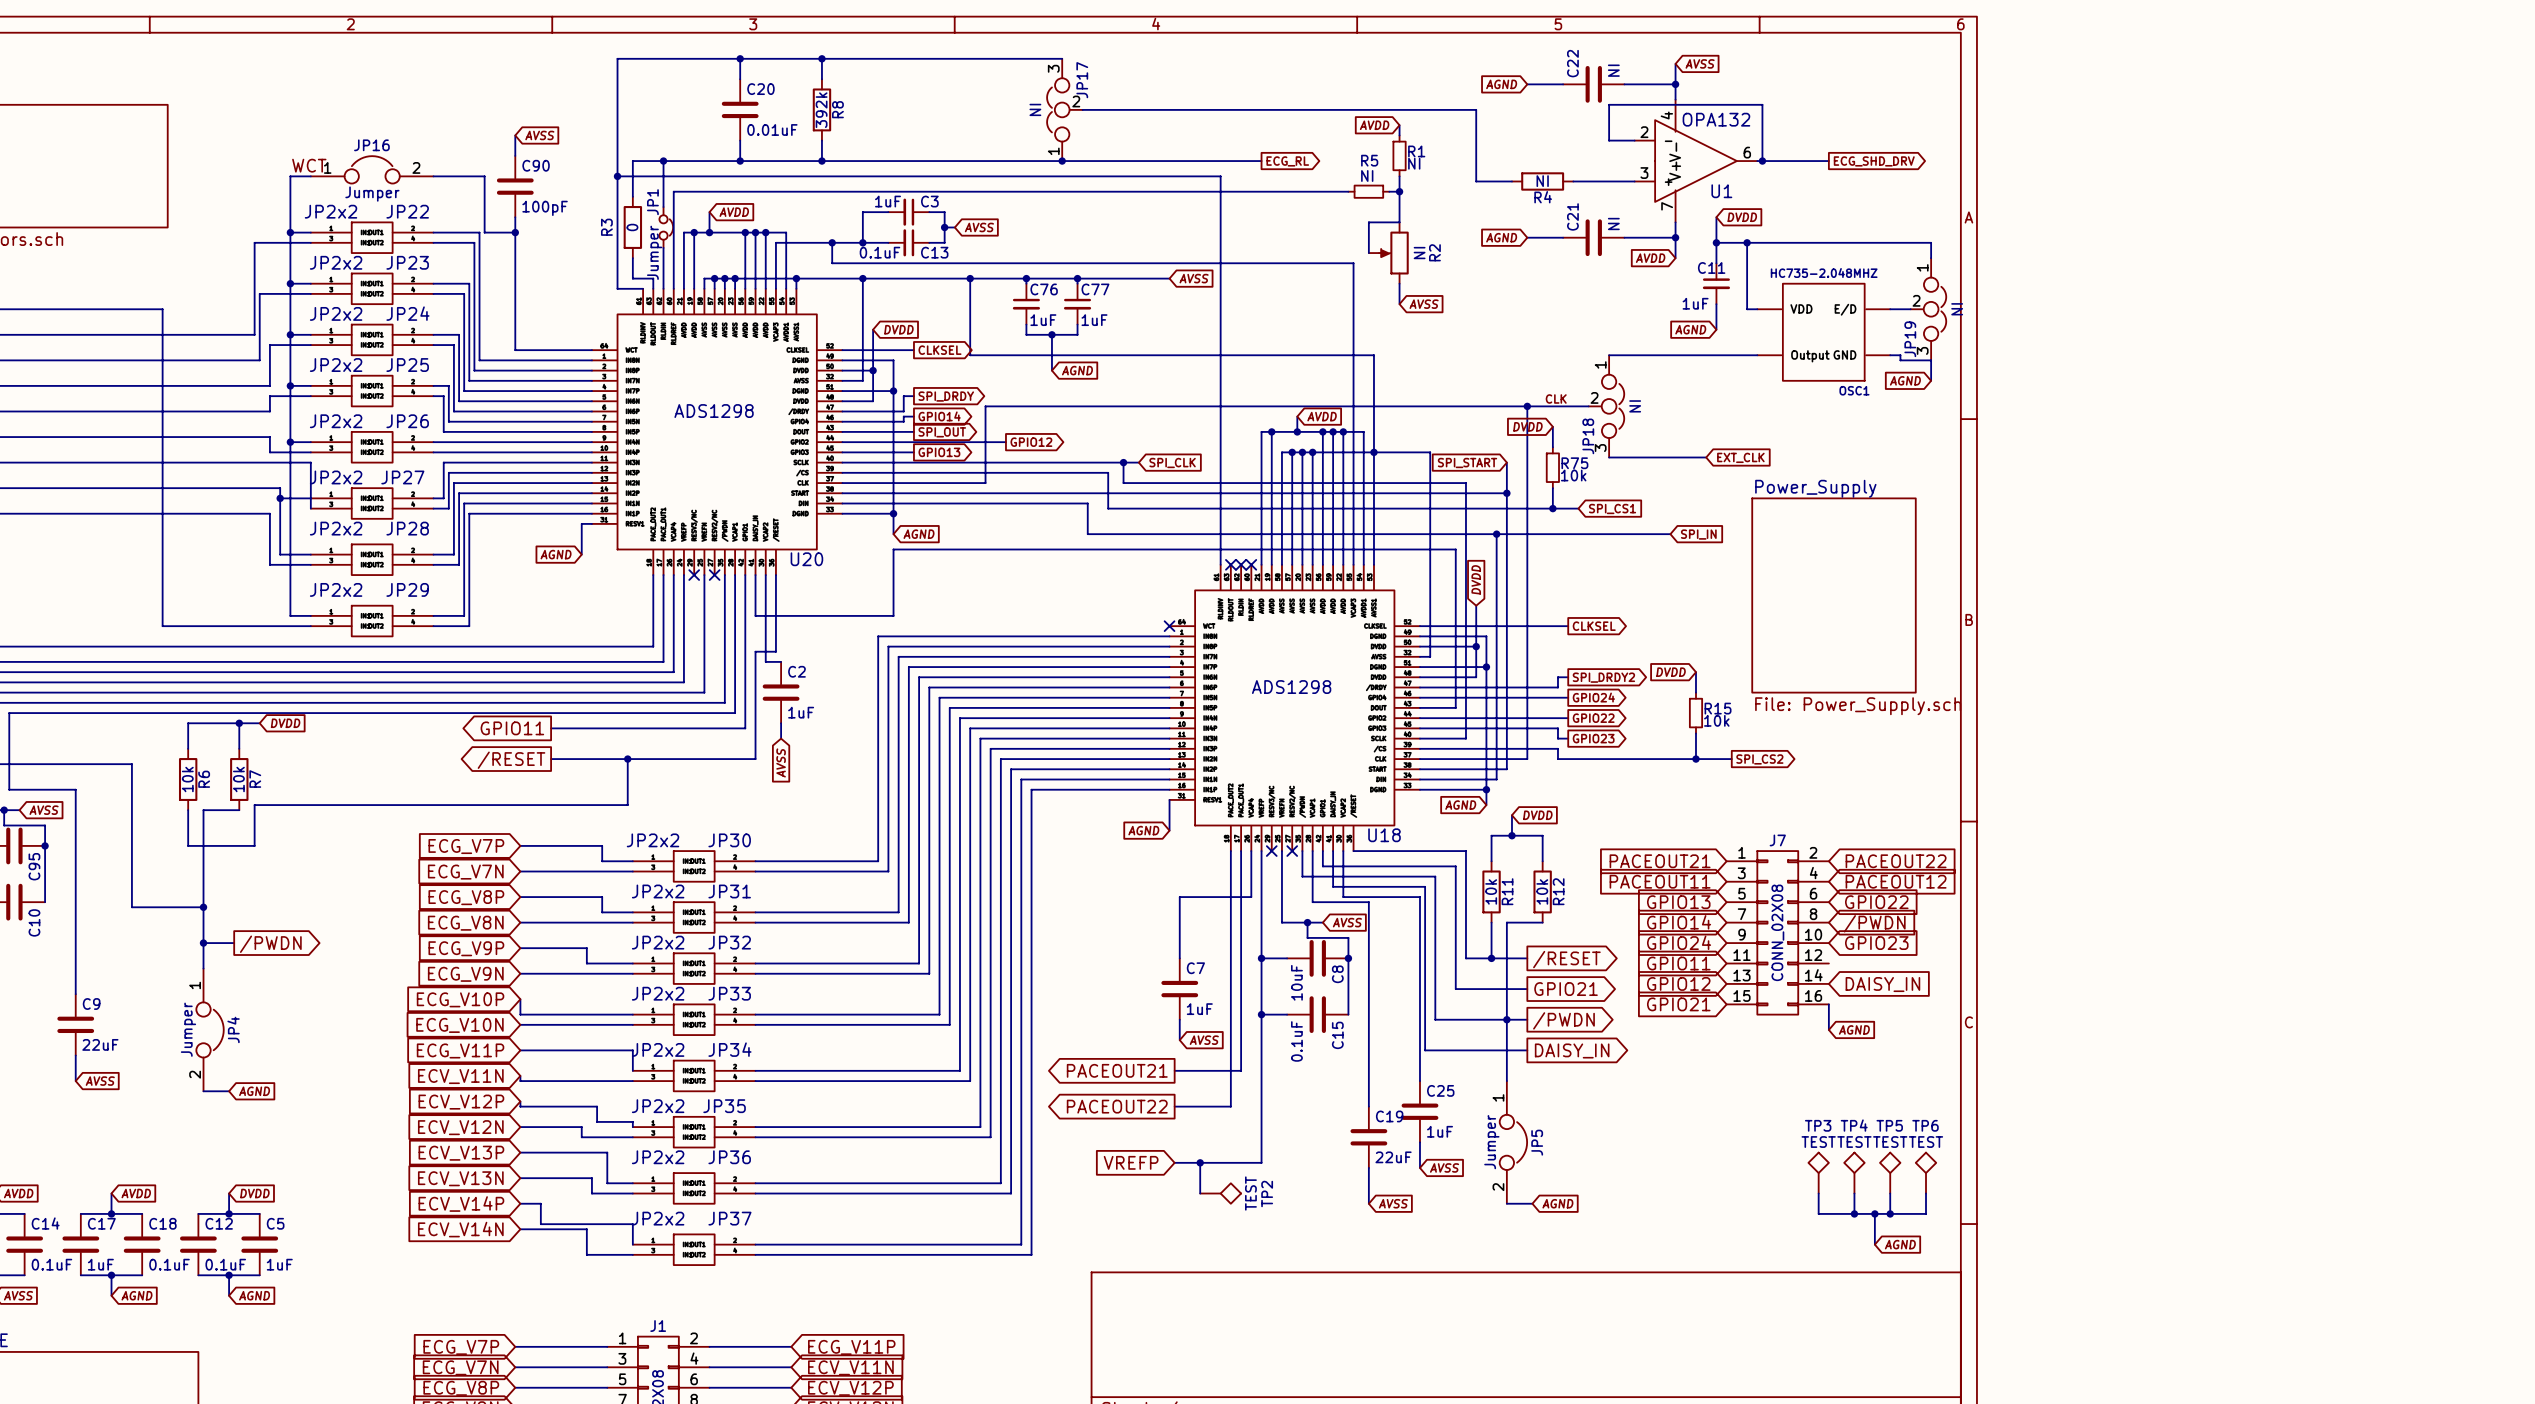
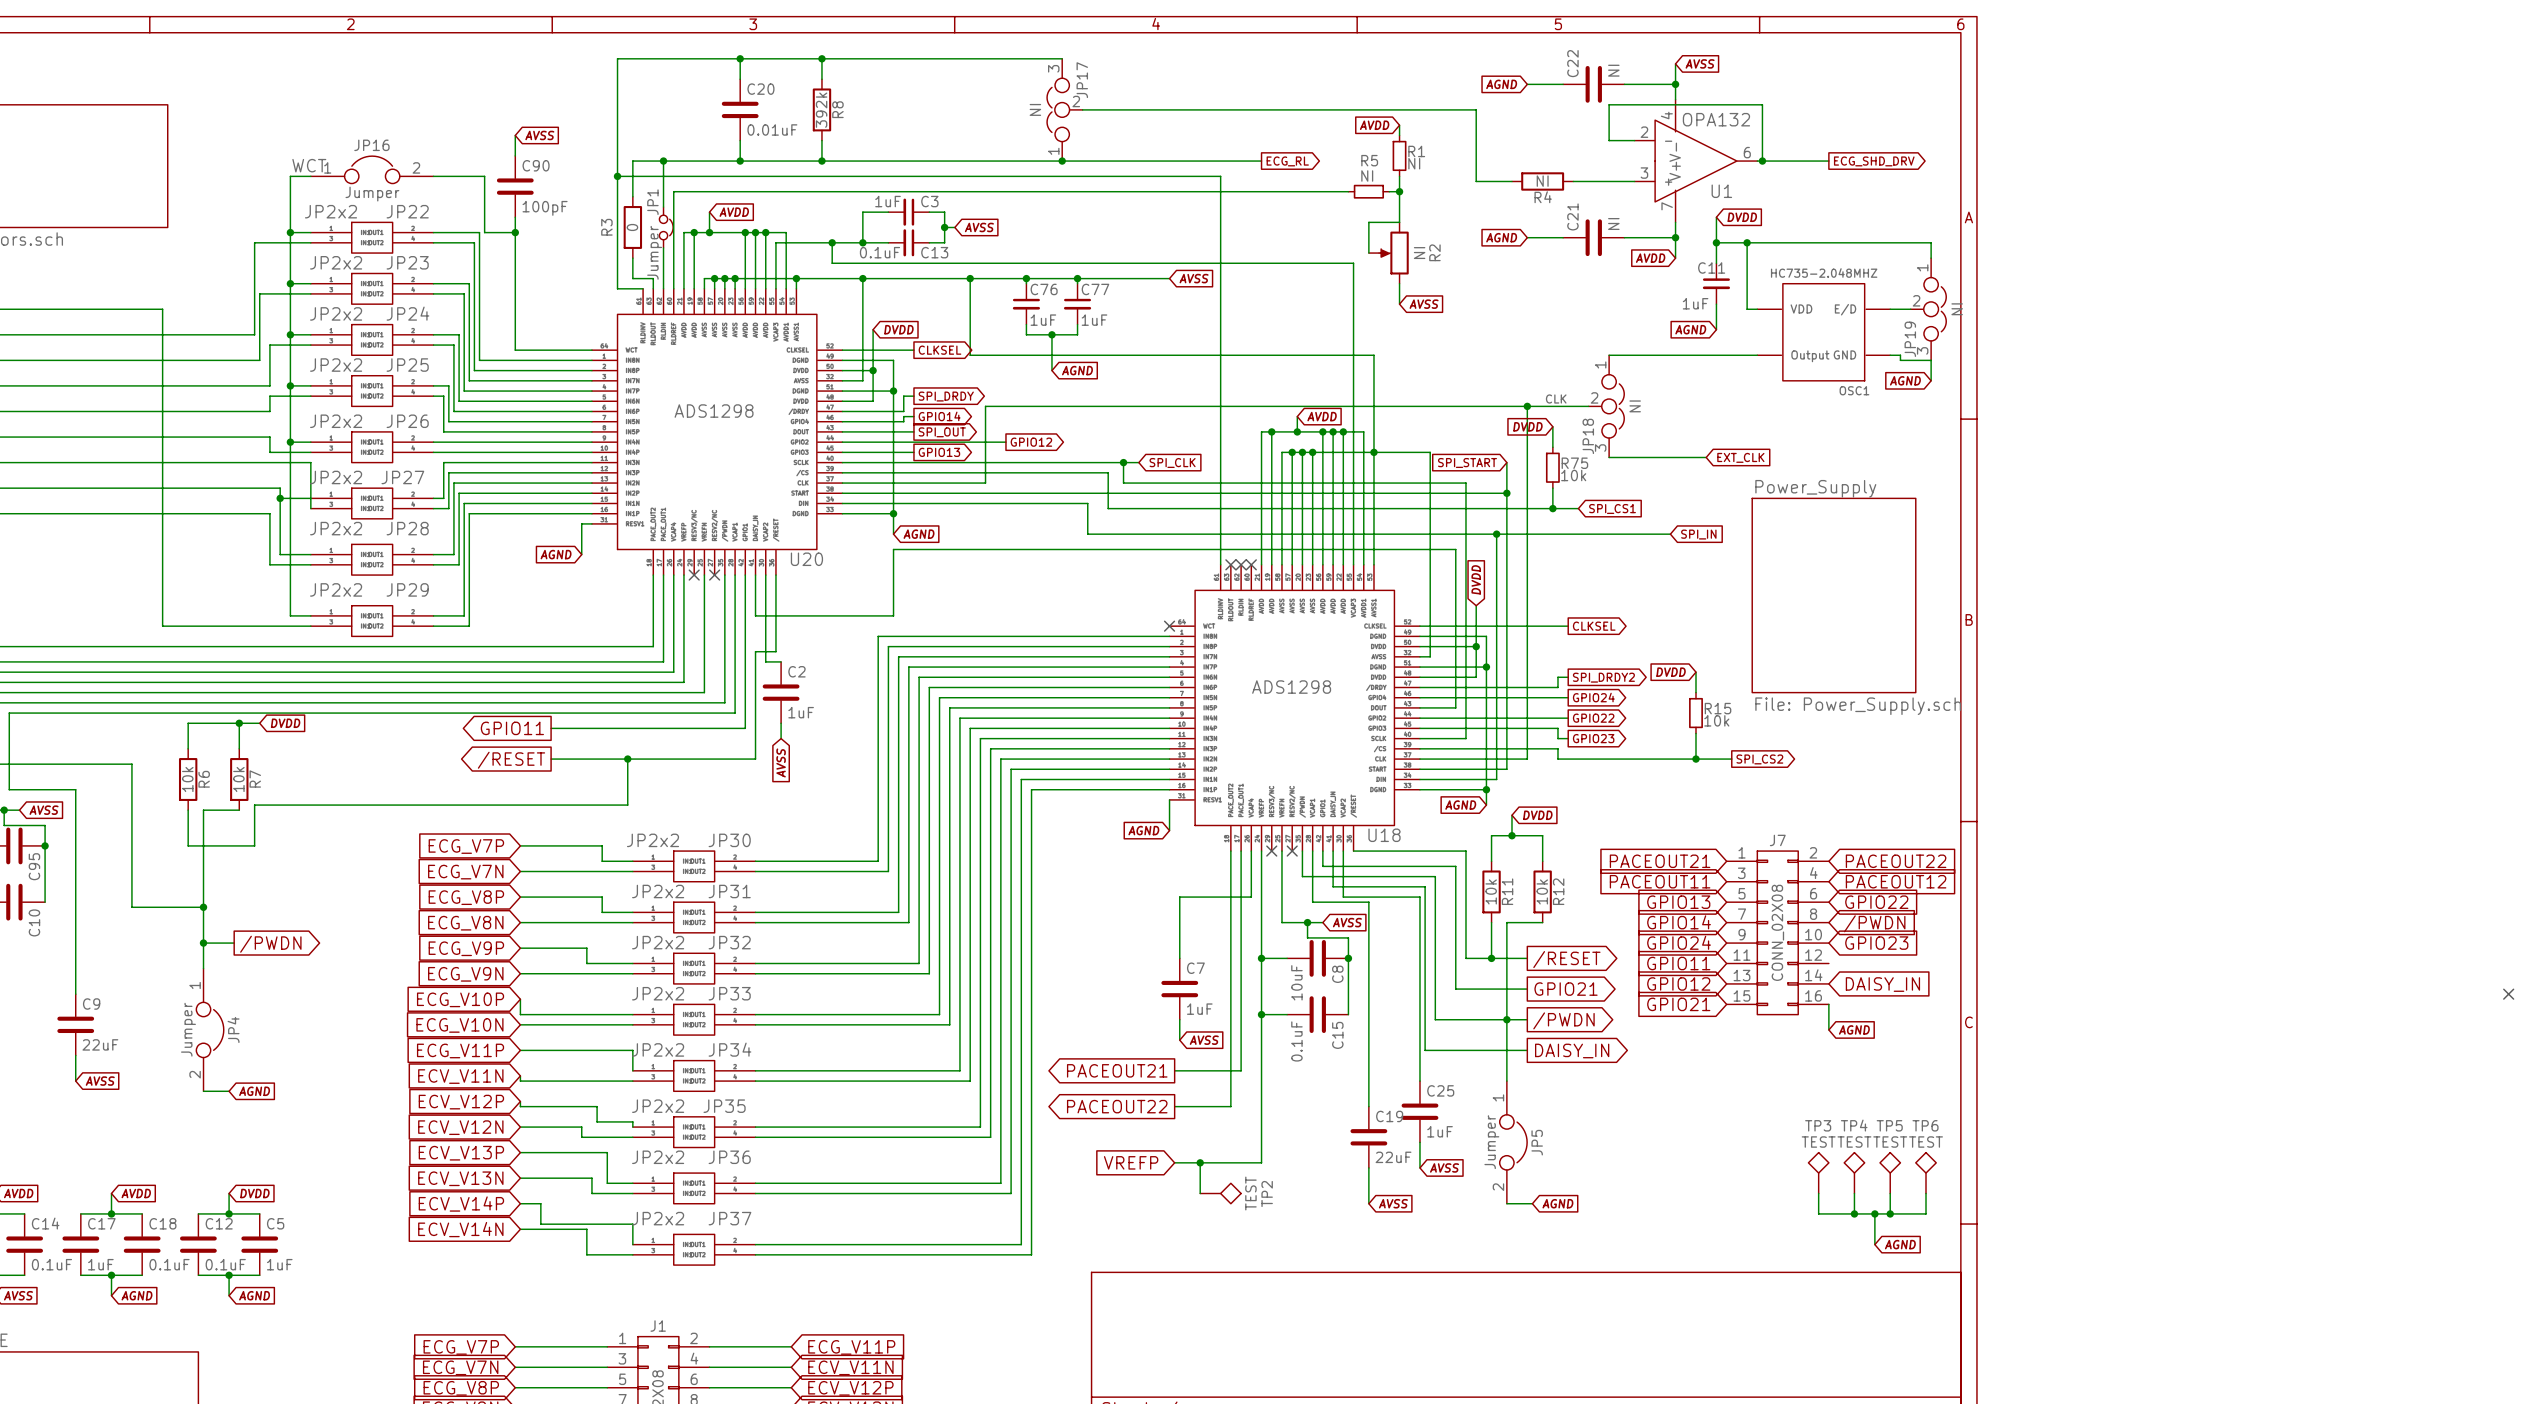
no-connect mark: none -> (2508, 994)

